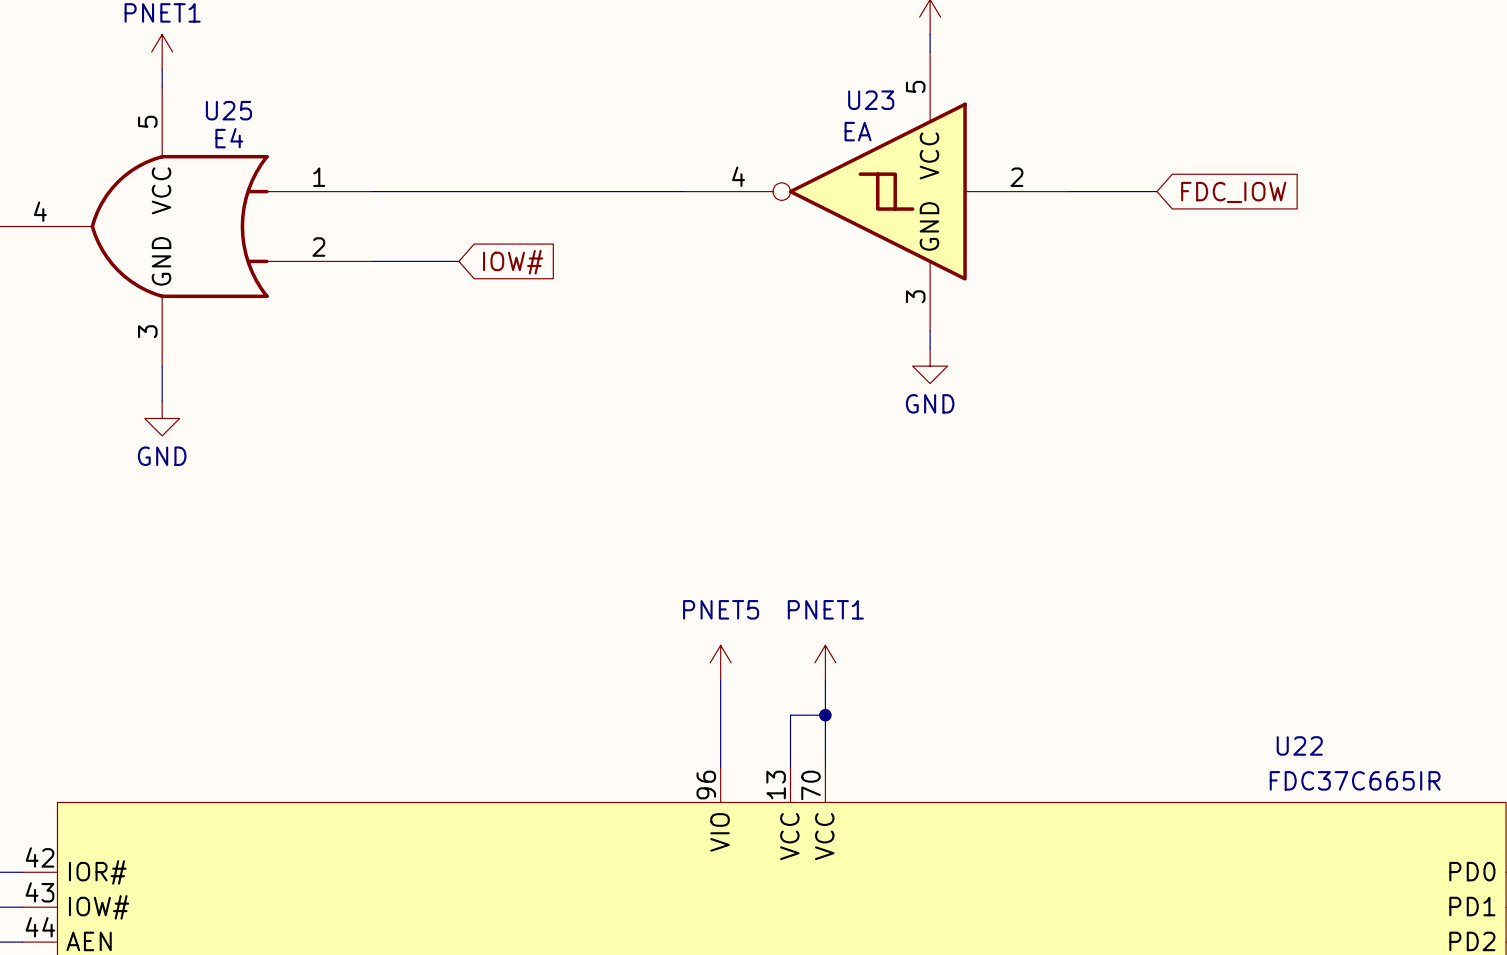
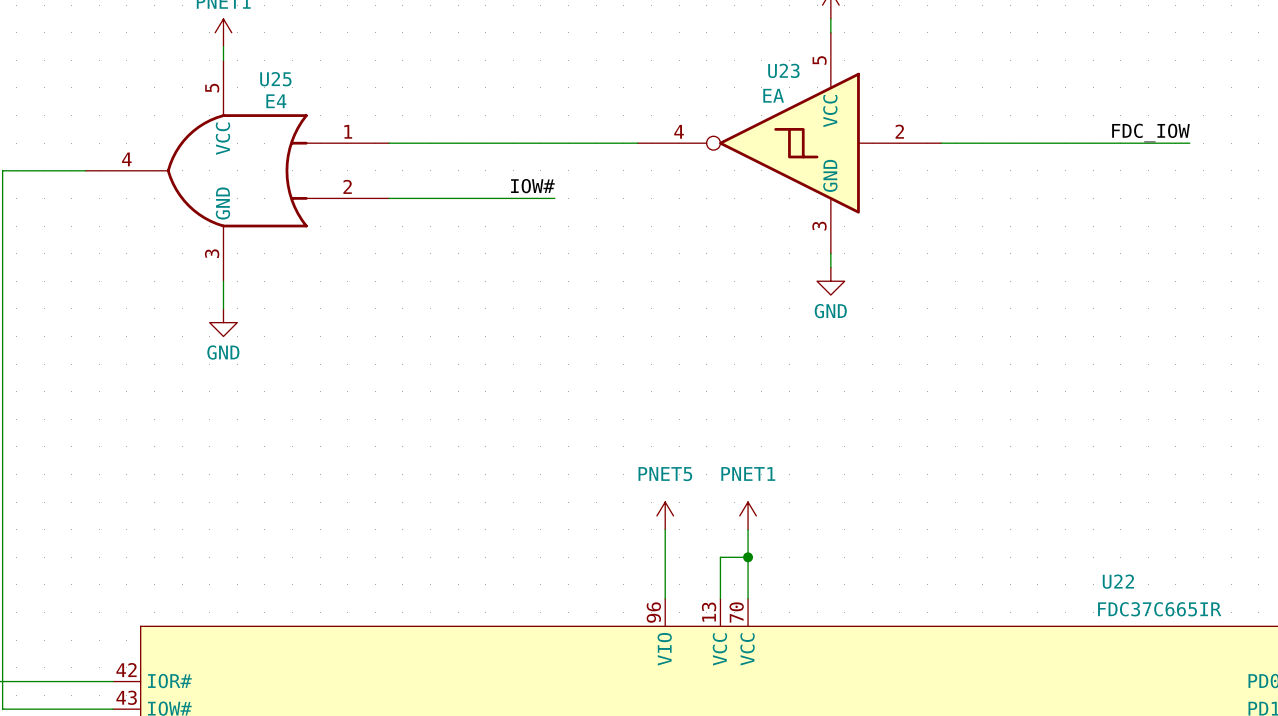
label: none -> FDC_IOW (1150, 132)
wire: none -> (1010, 143) (1189, 143)
global label: FDC_IOW (1233, 192) -> none
label: none -> IOW# (532, 186)
wire: none -> (458, 198) (554, 198)
global label: IOW# (513, 262) -> none

